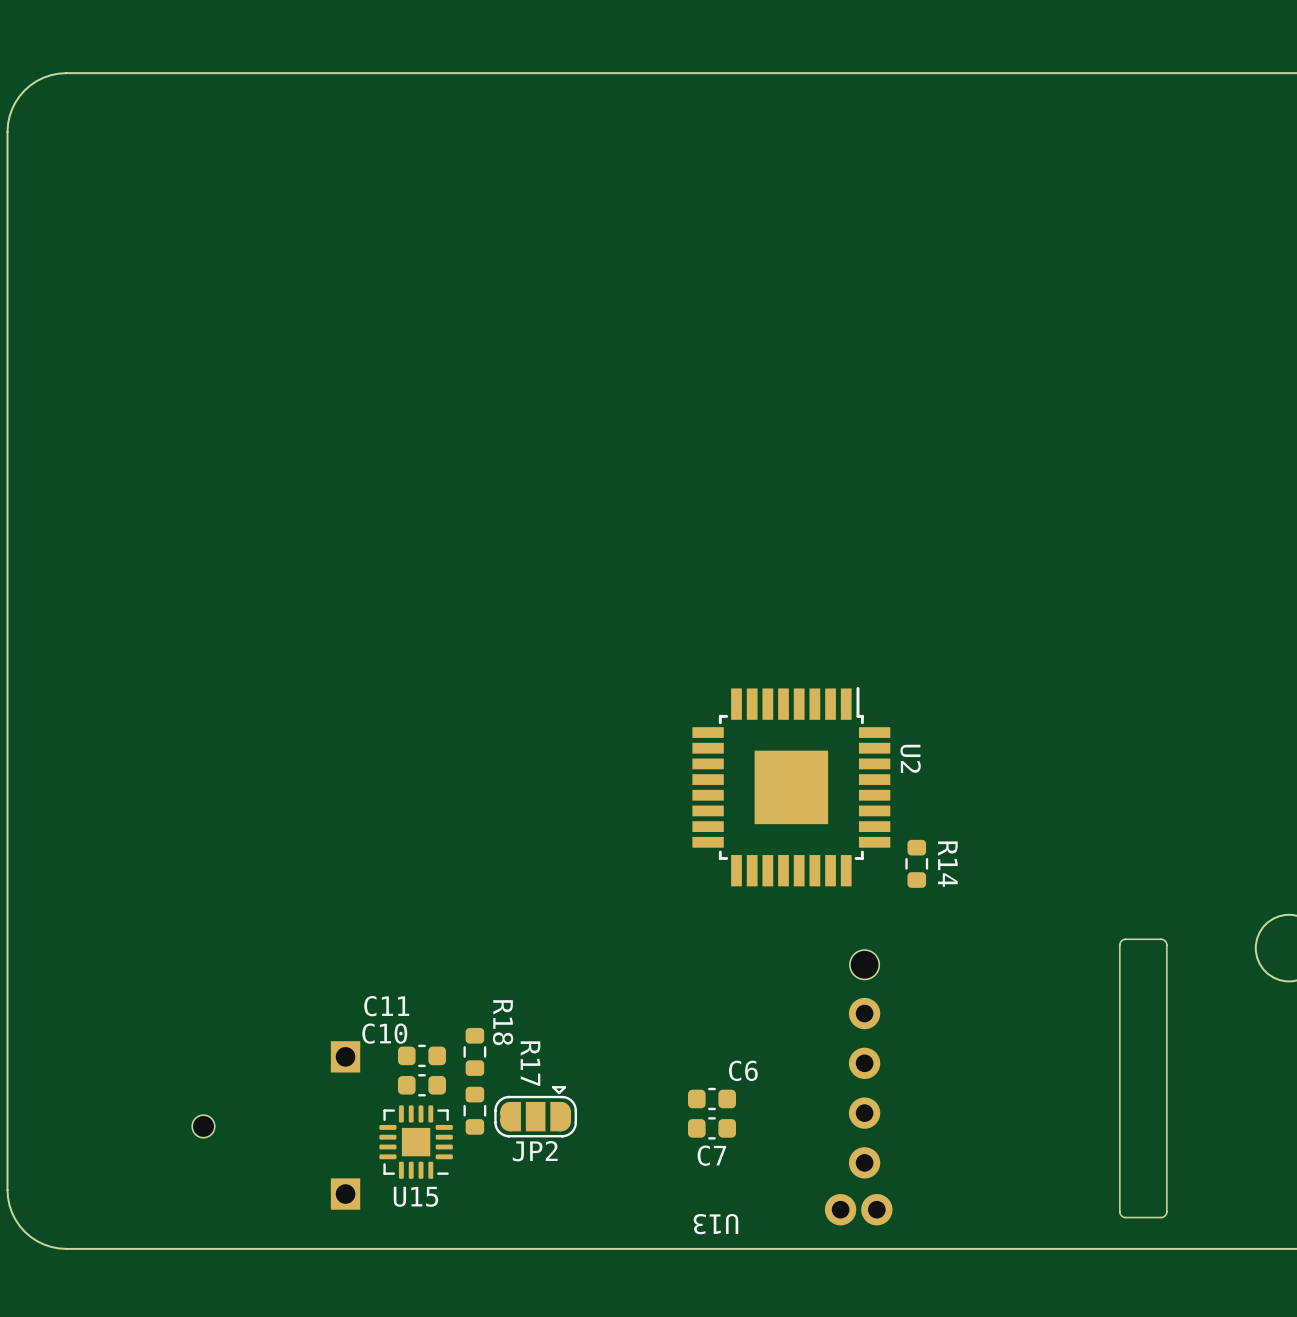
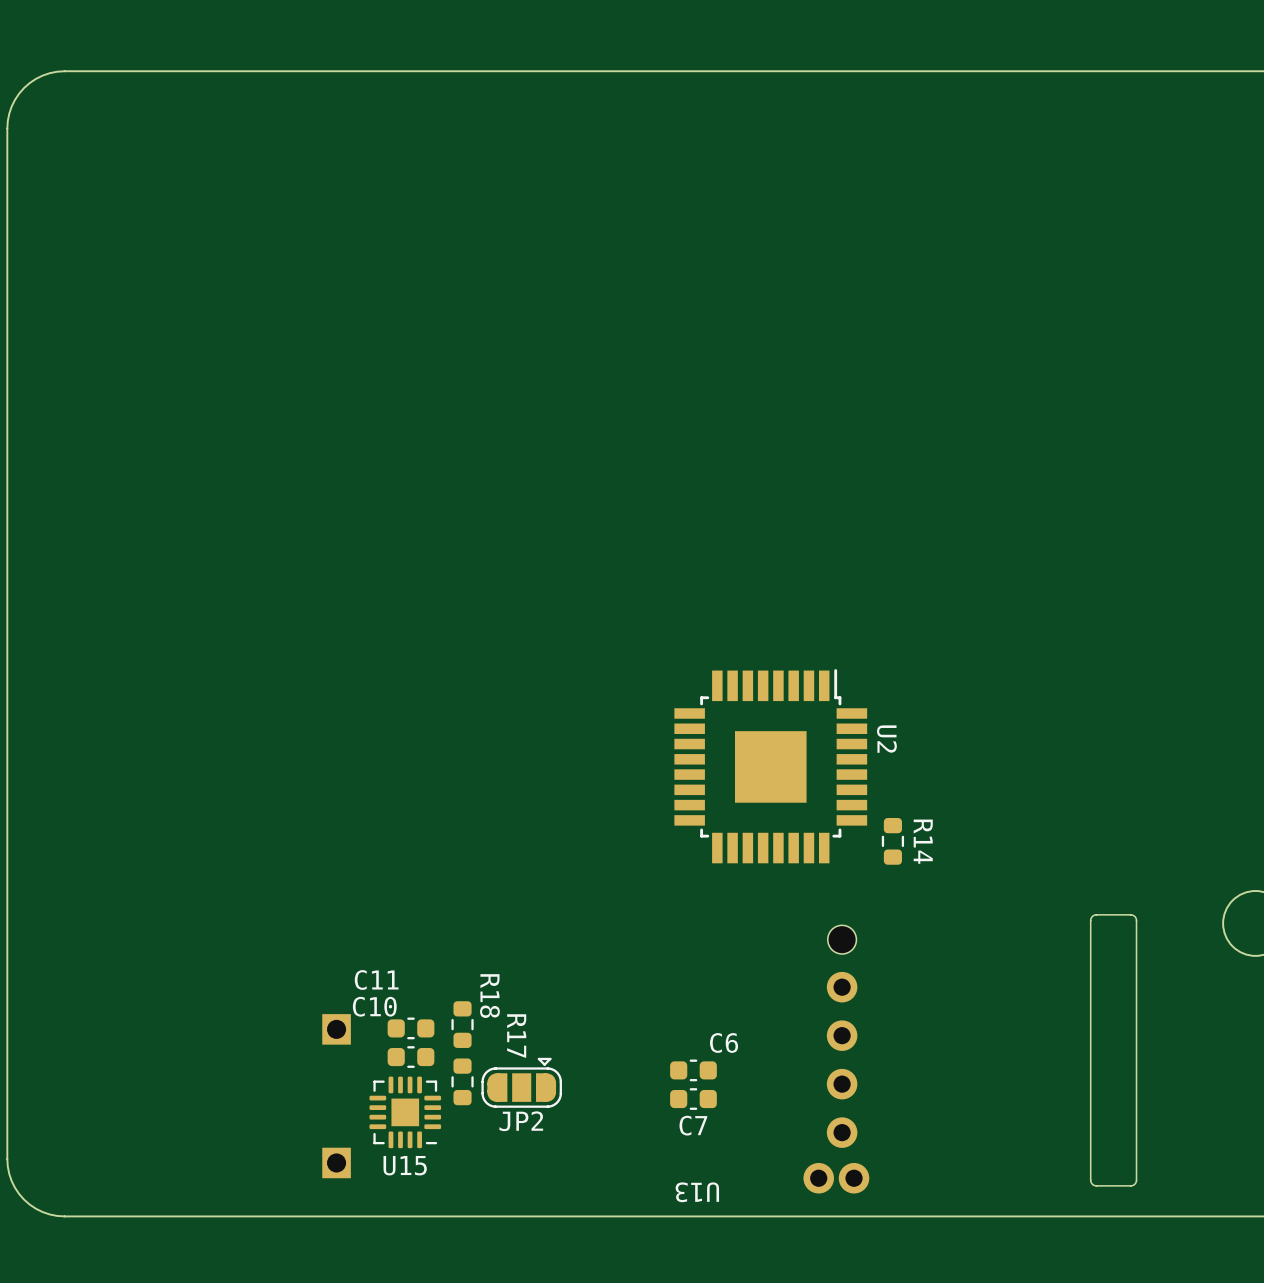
part: (203, 1126) -> none

